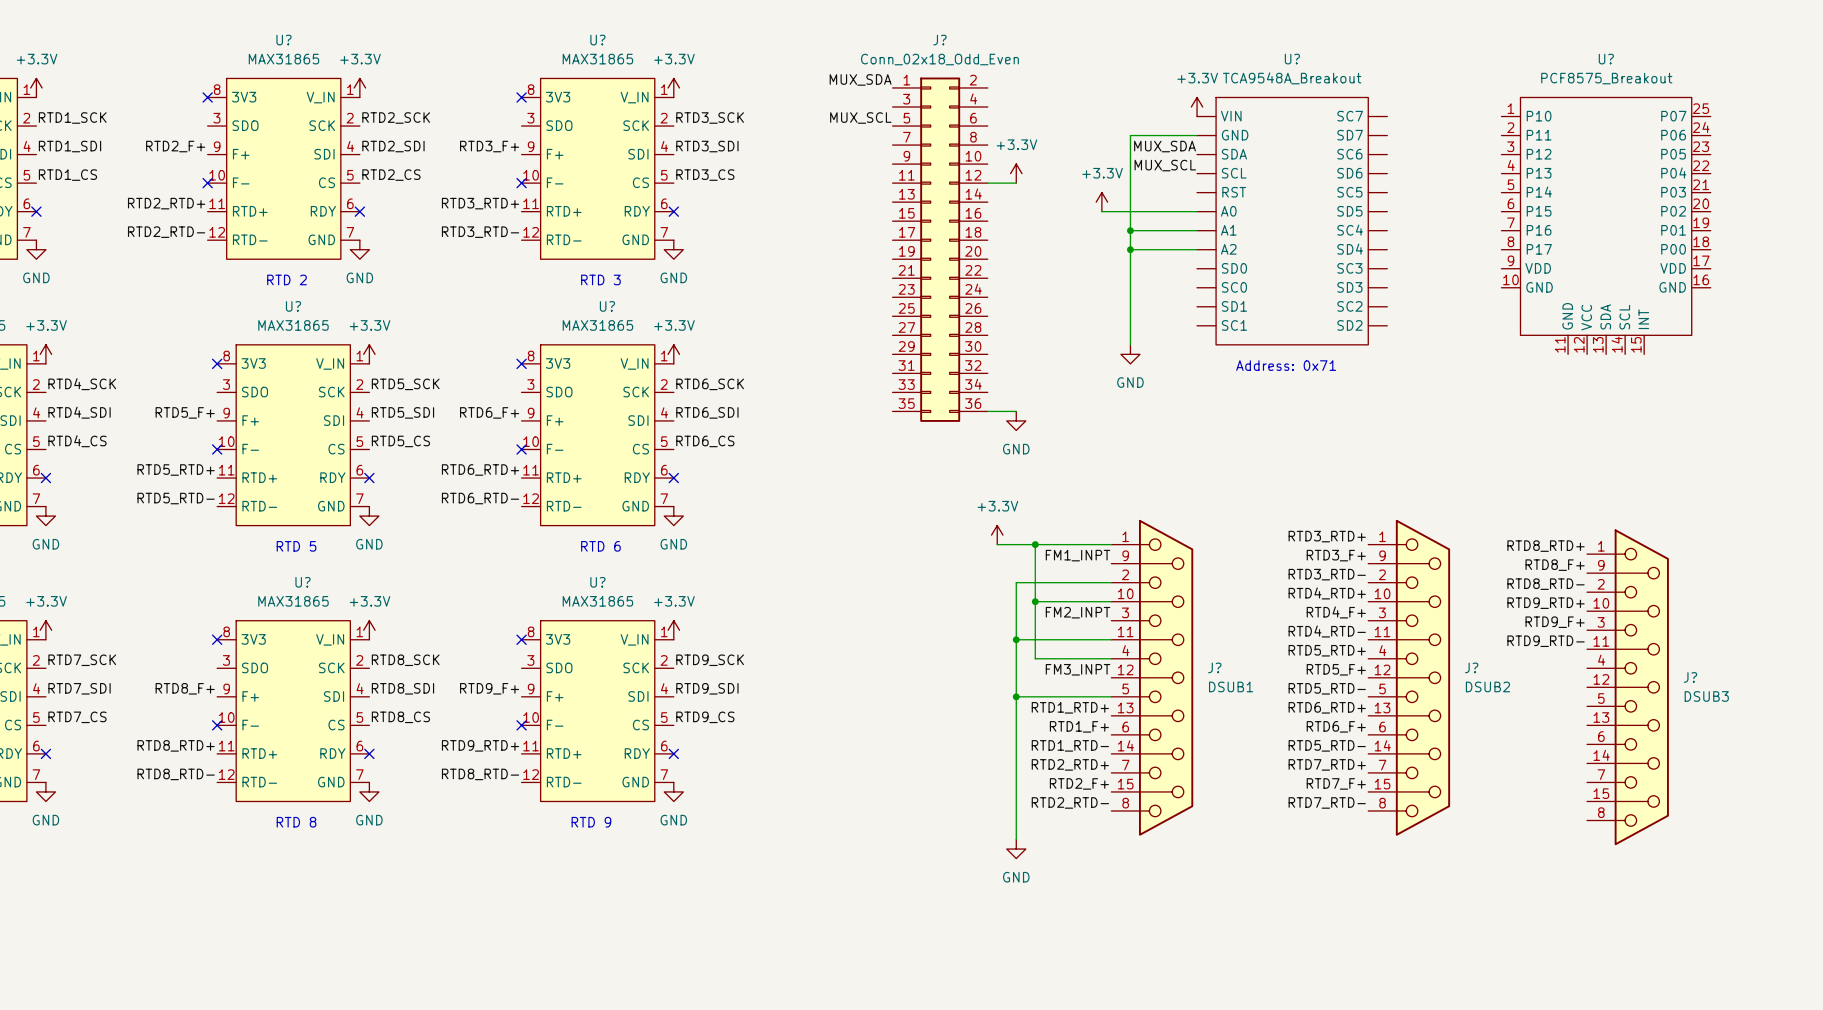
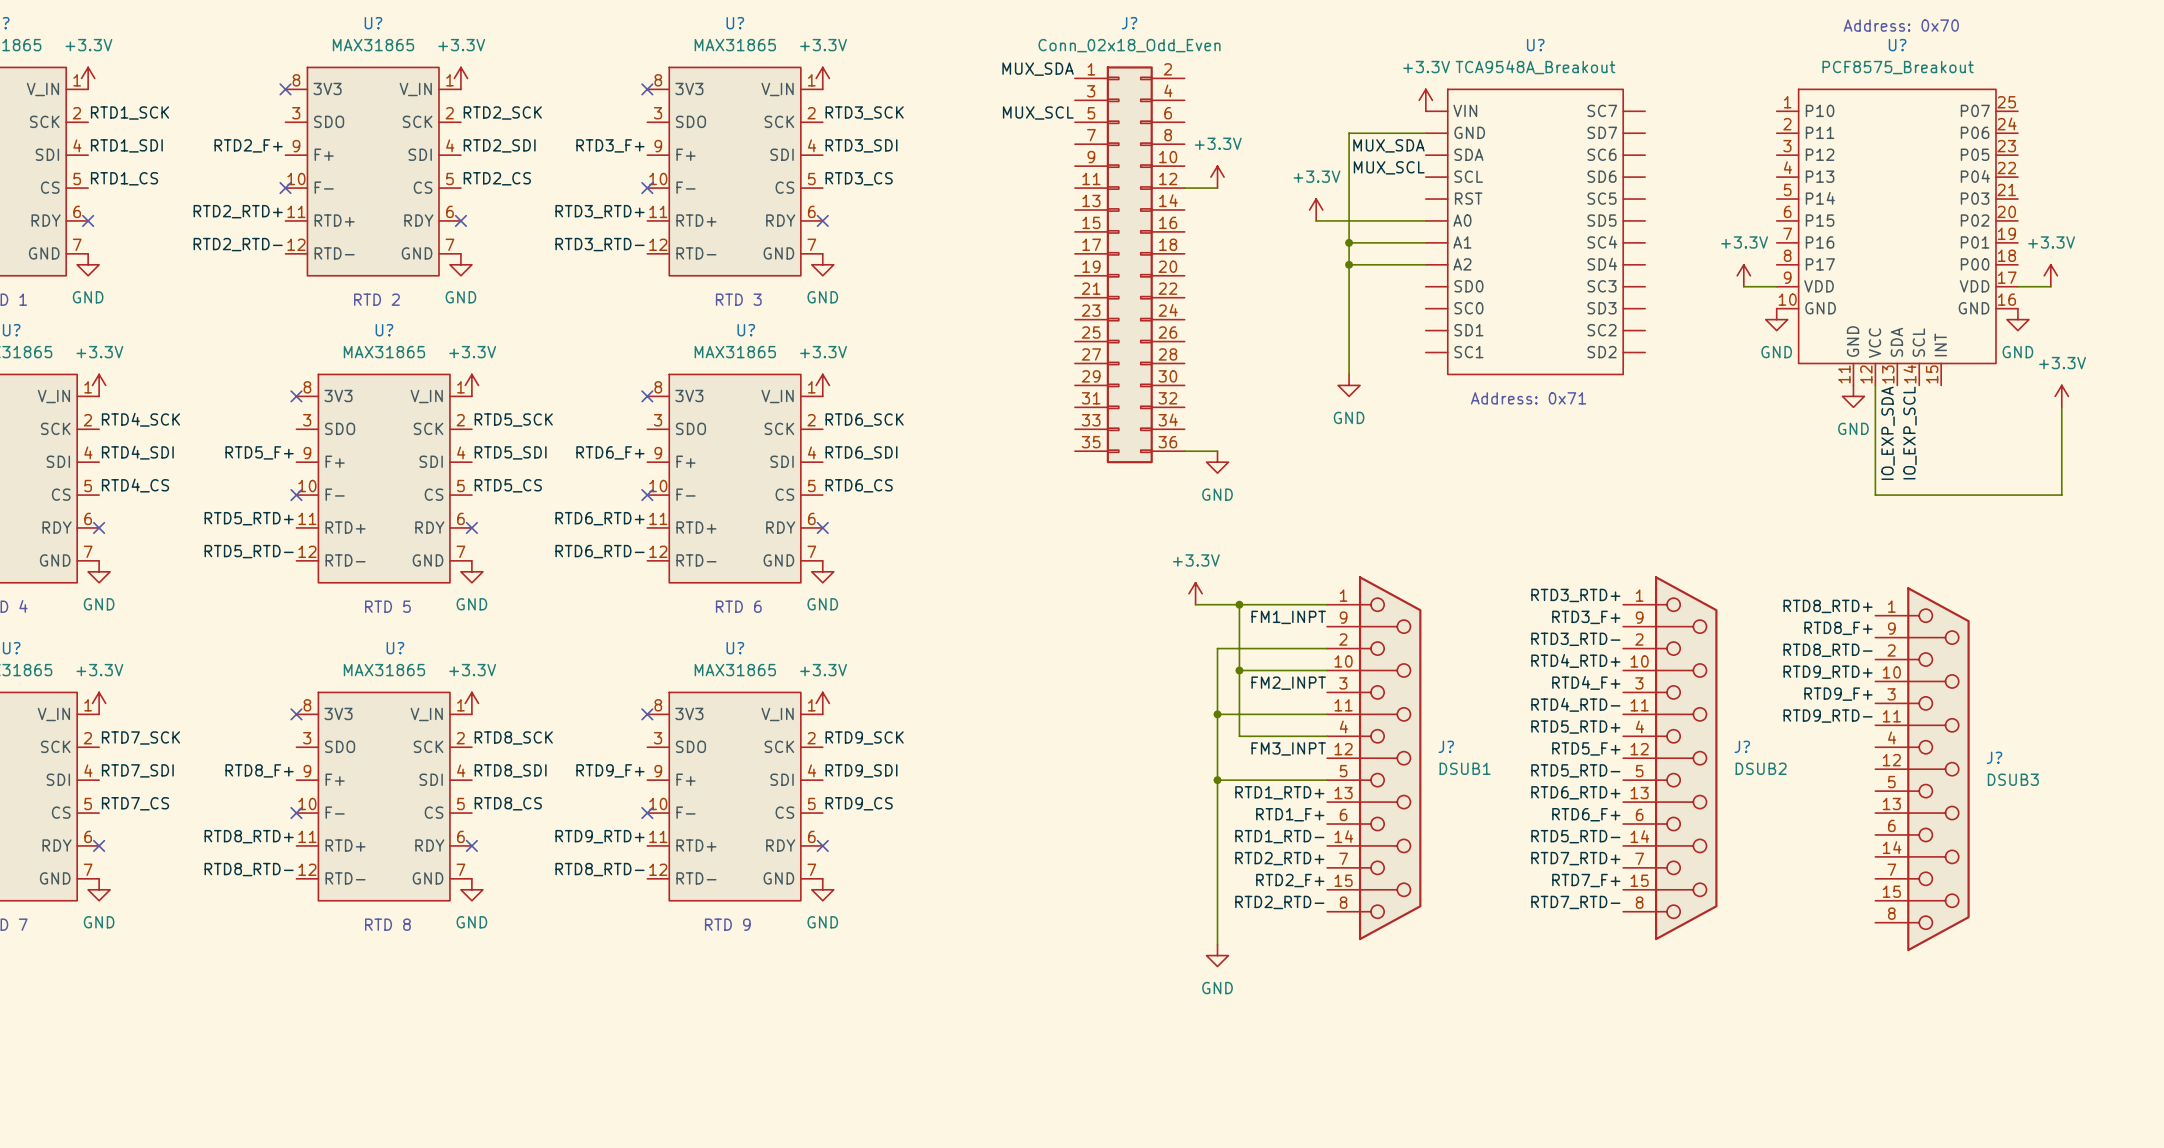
text: none -> Address: 0x70 (1901, 25)
power symbol: none -> +3.3V (1743, 275)
power symbol: none -> +3.3V (2050, 275)
wire: none -> (1743, 286) (1776, 286)
wire: none -> (2017, 286) (2050, 286)
power symbol: none -> GND (1776, 319)
power symbol: none -> GND (2017, 319)
wire: none -> (1875, 385) (1875, 495) (2061, 495) (2061, 407)
power symbol: none -> GND (1853, 396)
power symbol: none -> +3.3V (2061, 396)
label: none -> IO_EXP_SDA (1888, 433)
label: none -> IO_EXP_SCL (1909, 433)

